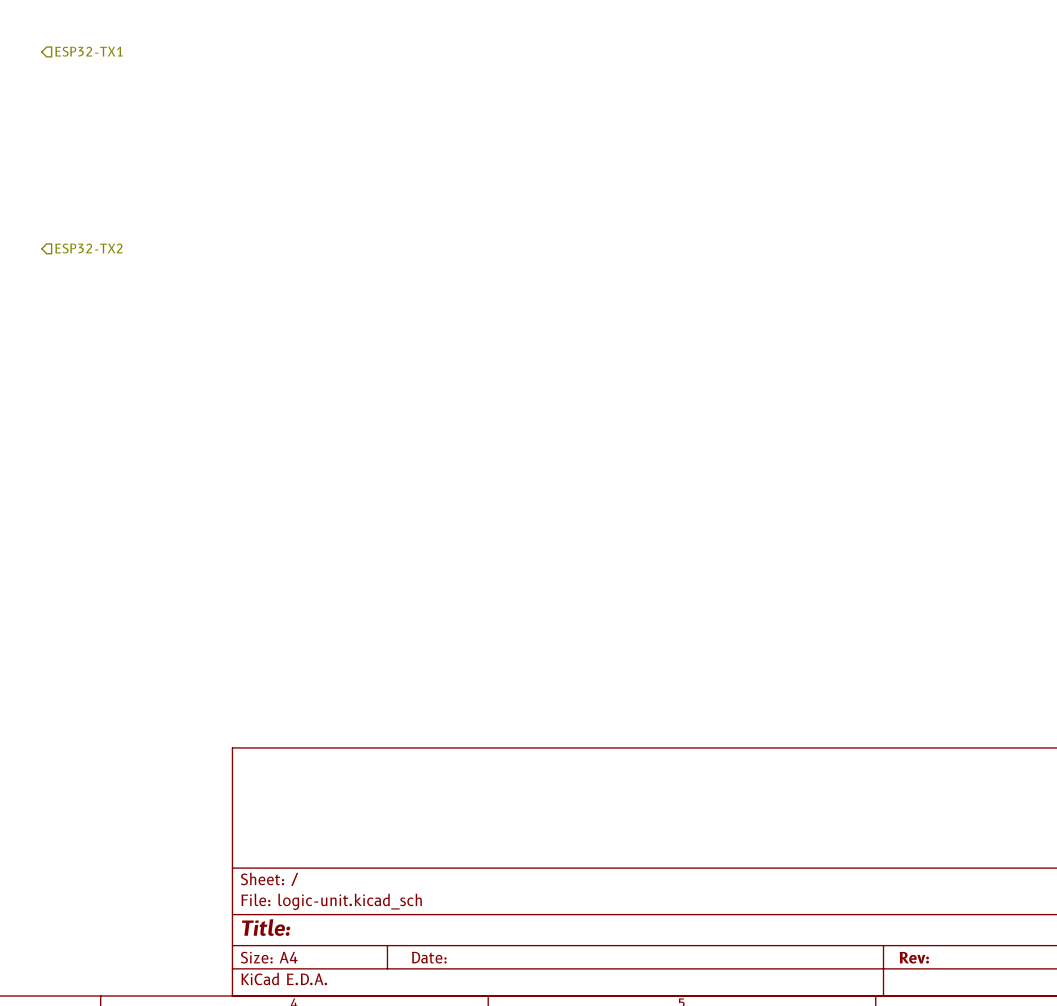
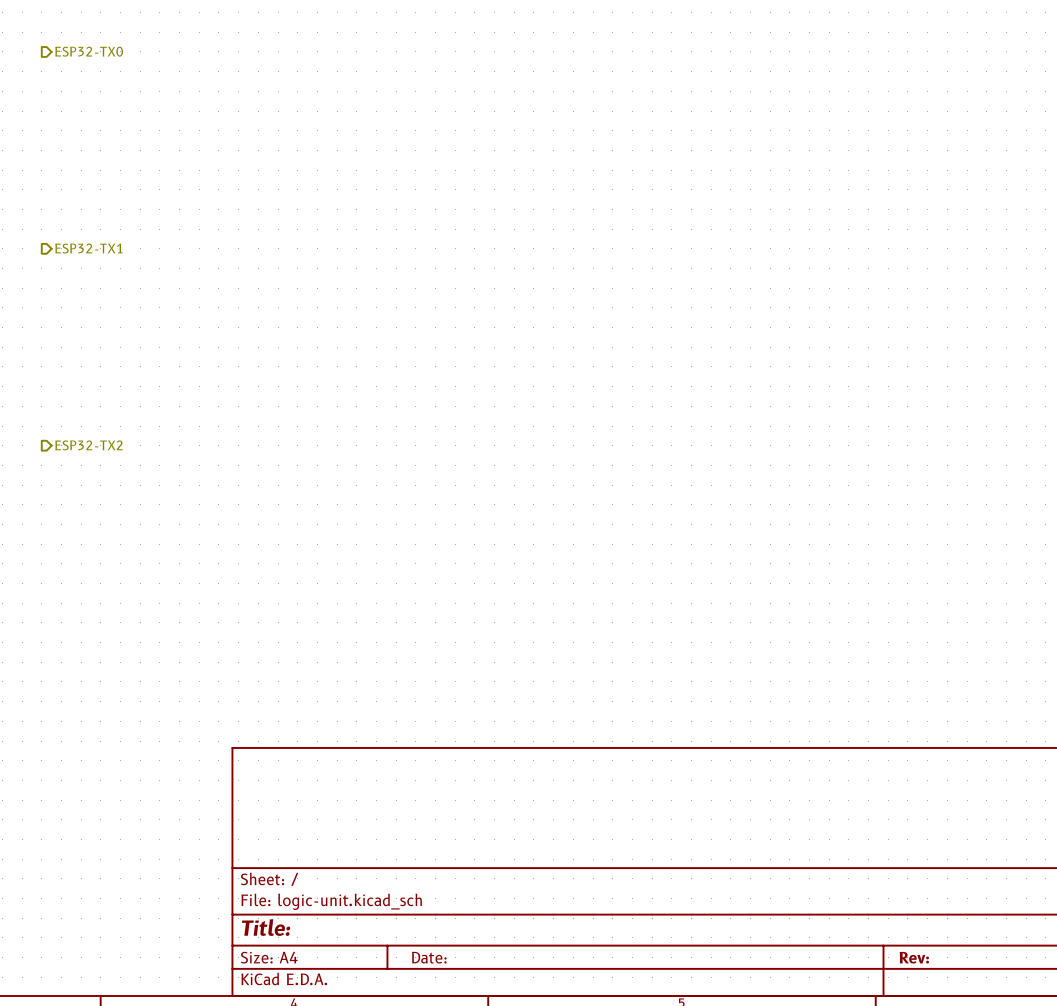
hierarchical label shape: input (88, 51) -> output (89, 51)
hierarchical label: ESP32-TX1 (88, 51) -> ESP32-TX0 (89, 51)
hierarchical label shape: input (88, 248) -> output (88, 248)
hierarchical label: ESP32-TX2 (88, 248) -> ESP32-TX1 (88, 248)
hierarchical label: none -> ESP32-TX2 (88, 445)

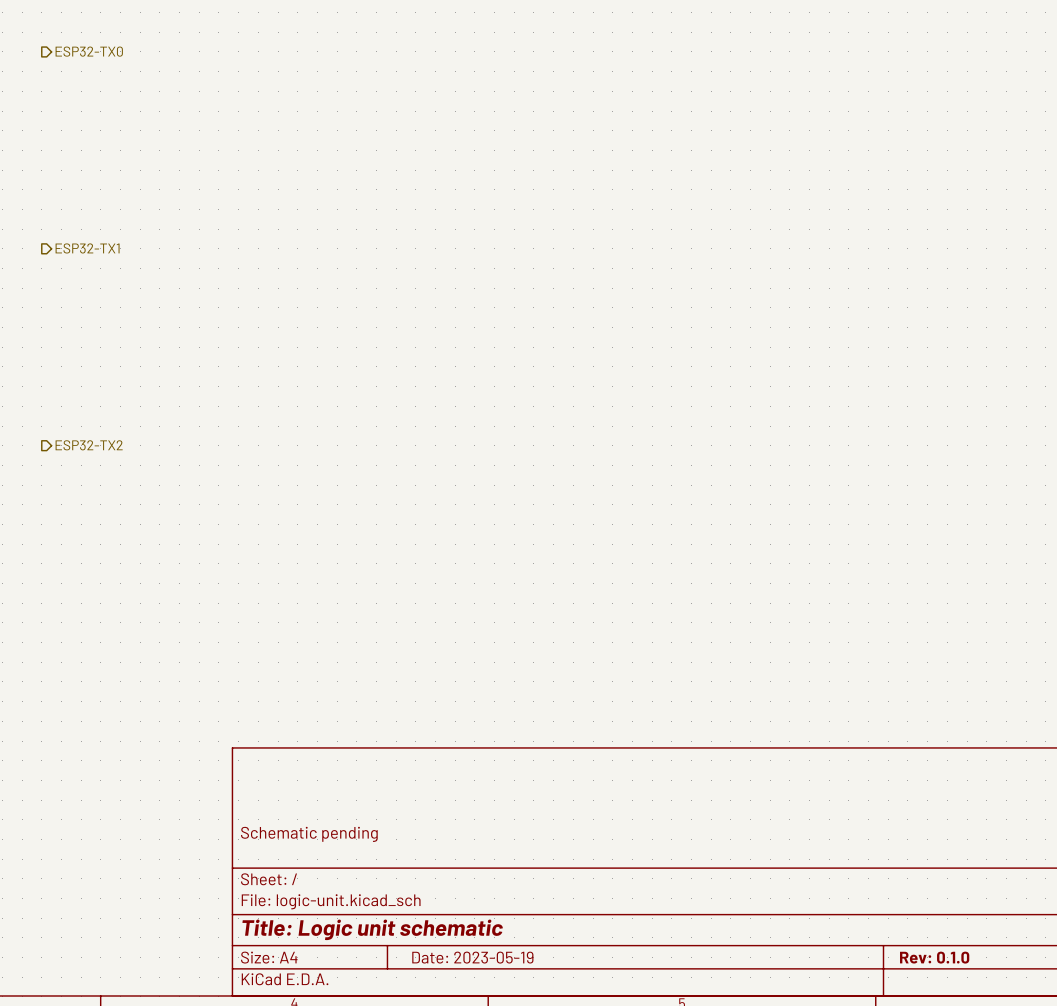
title block: none -> Schematic pending (309, 834)
title block: Title: (266, 927) -> Title: Logic unit schematic (372, 929)
title block: Date: (429, 957) -> Date: 2023-05-19 (472, 957)
title block: Rev: (914, 957) -> Rev: 0.1.0 (934, 957)

